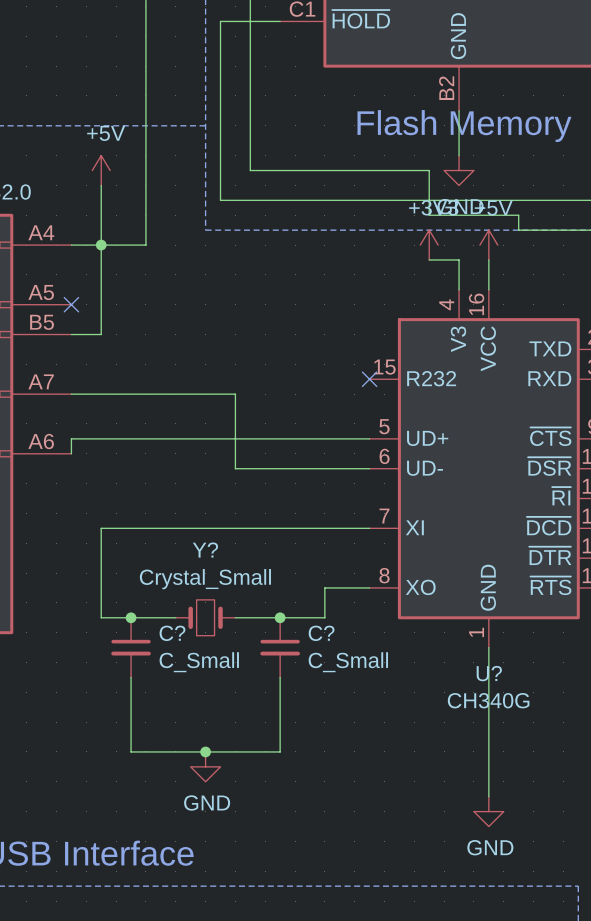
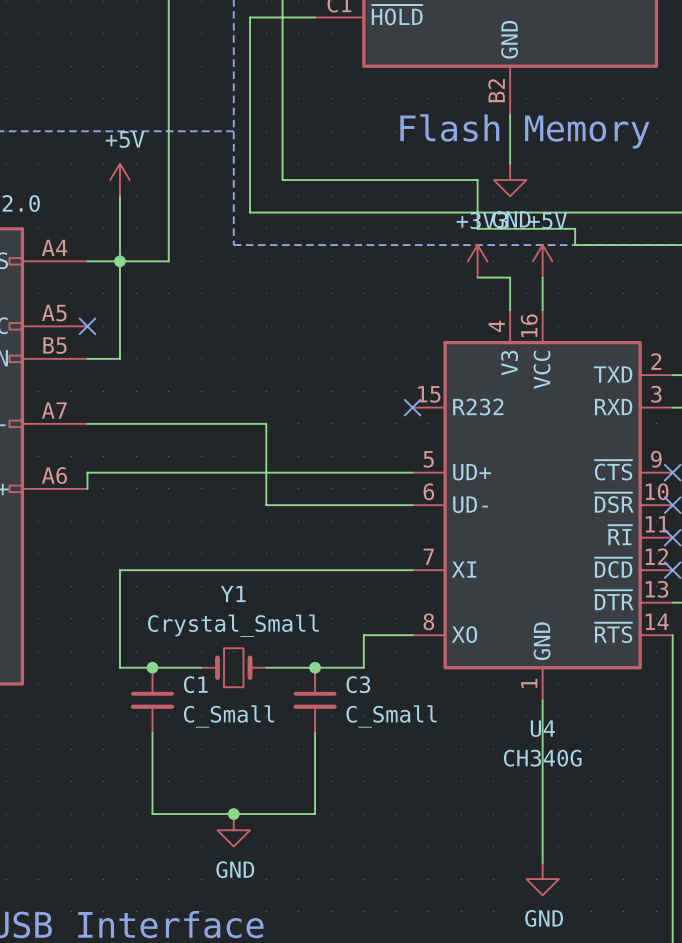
Y? name: Y? (205, 550) -> Y1 (233, 593)
C? name: C? (172, 633) -> C1 (195, 684)
C? name: C? (321, 633) -> C3 (358, 684)
U? name: U? (489, 673) -> U4 (542, 728)

